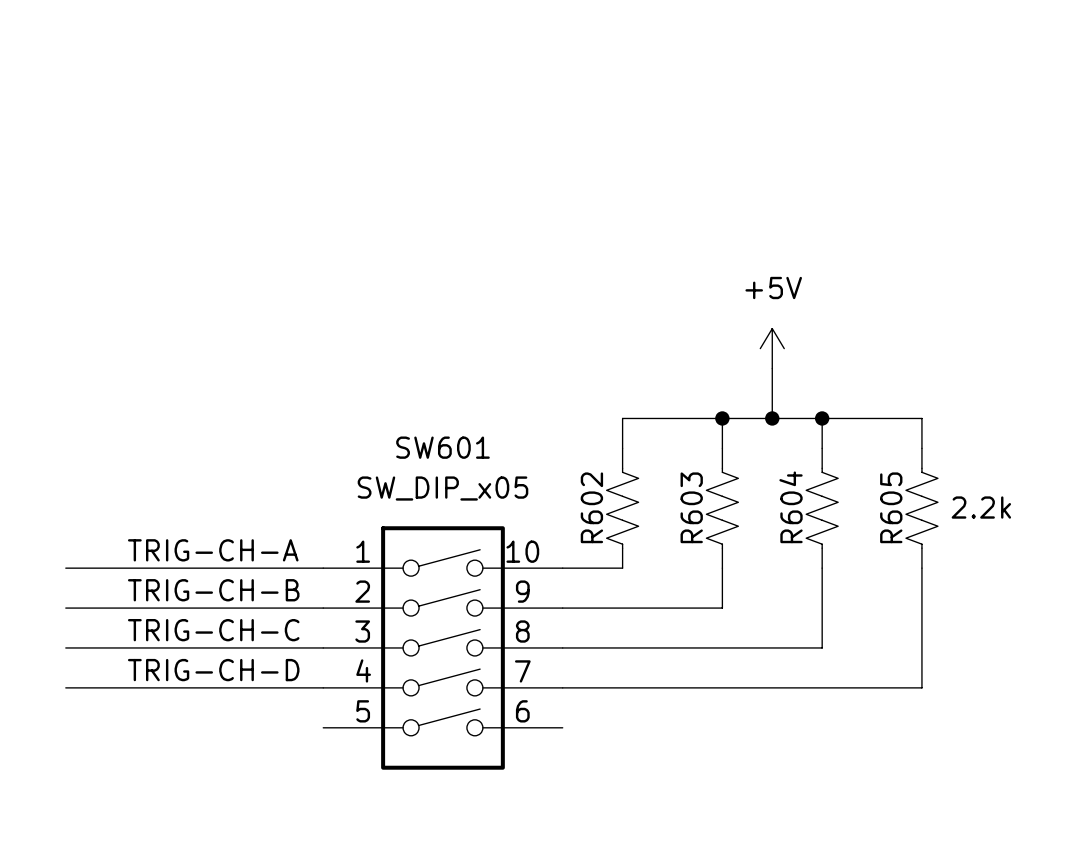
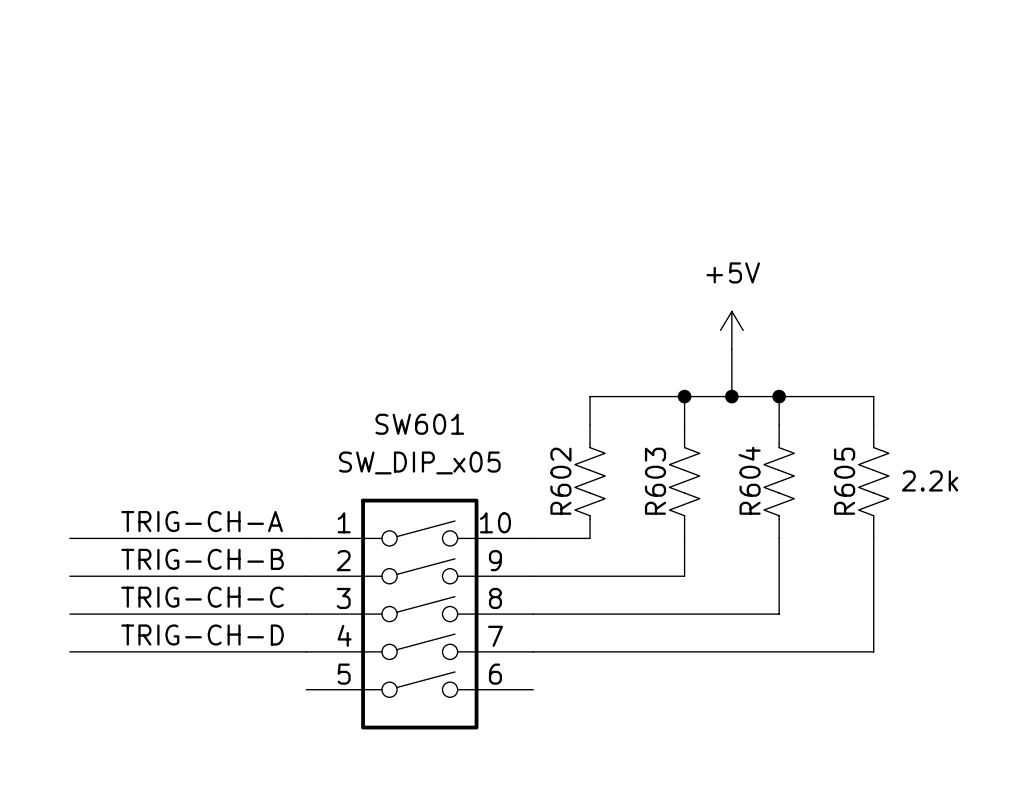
wire: (65, 568) (73, 568) -> none
wire: (65, 608) (73, 608) -> none
wire: (65, 647) (73, 647) -> none
wire: (65, 687) (73, 687) -> none

